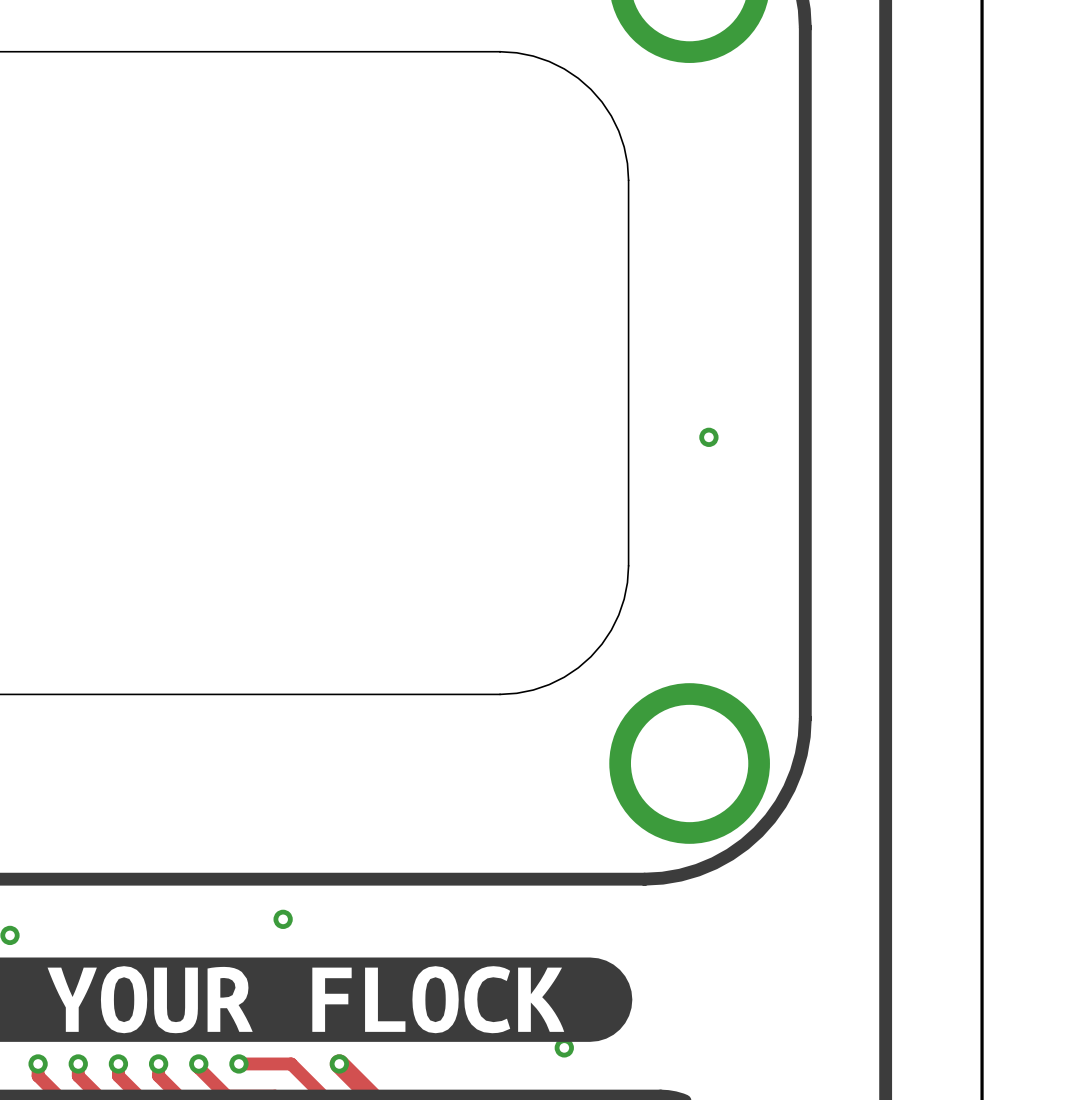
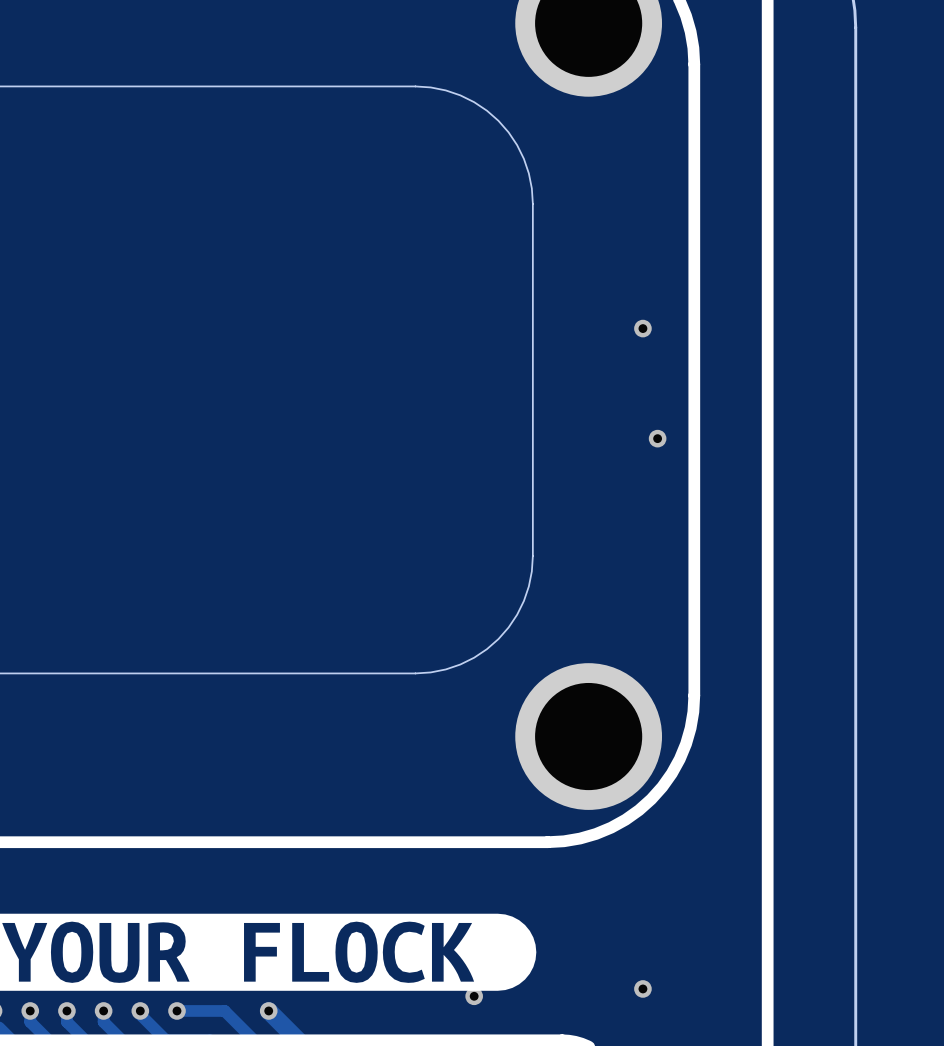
via: none -> (642, 328)
via position: (708, 437) -> (657, 438)
via: (283, 919) -> none
via: none -> (642, 988)

